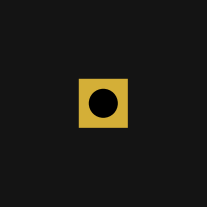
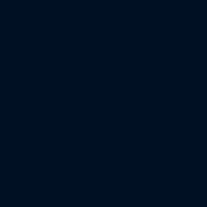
part: (103, 103) -> none

